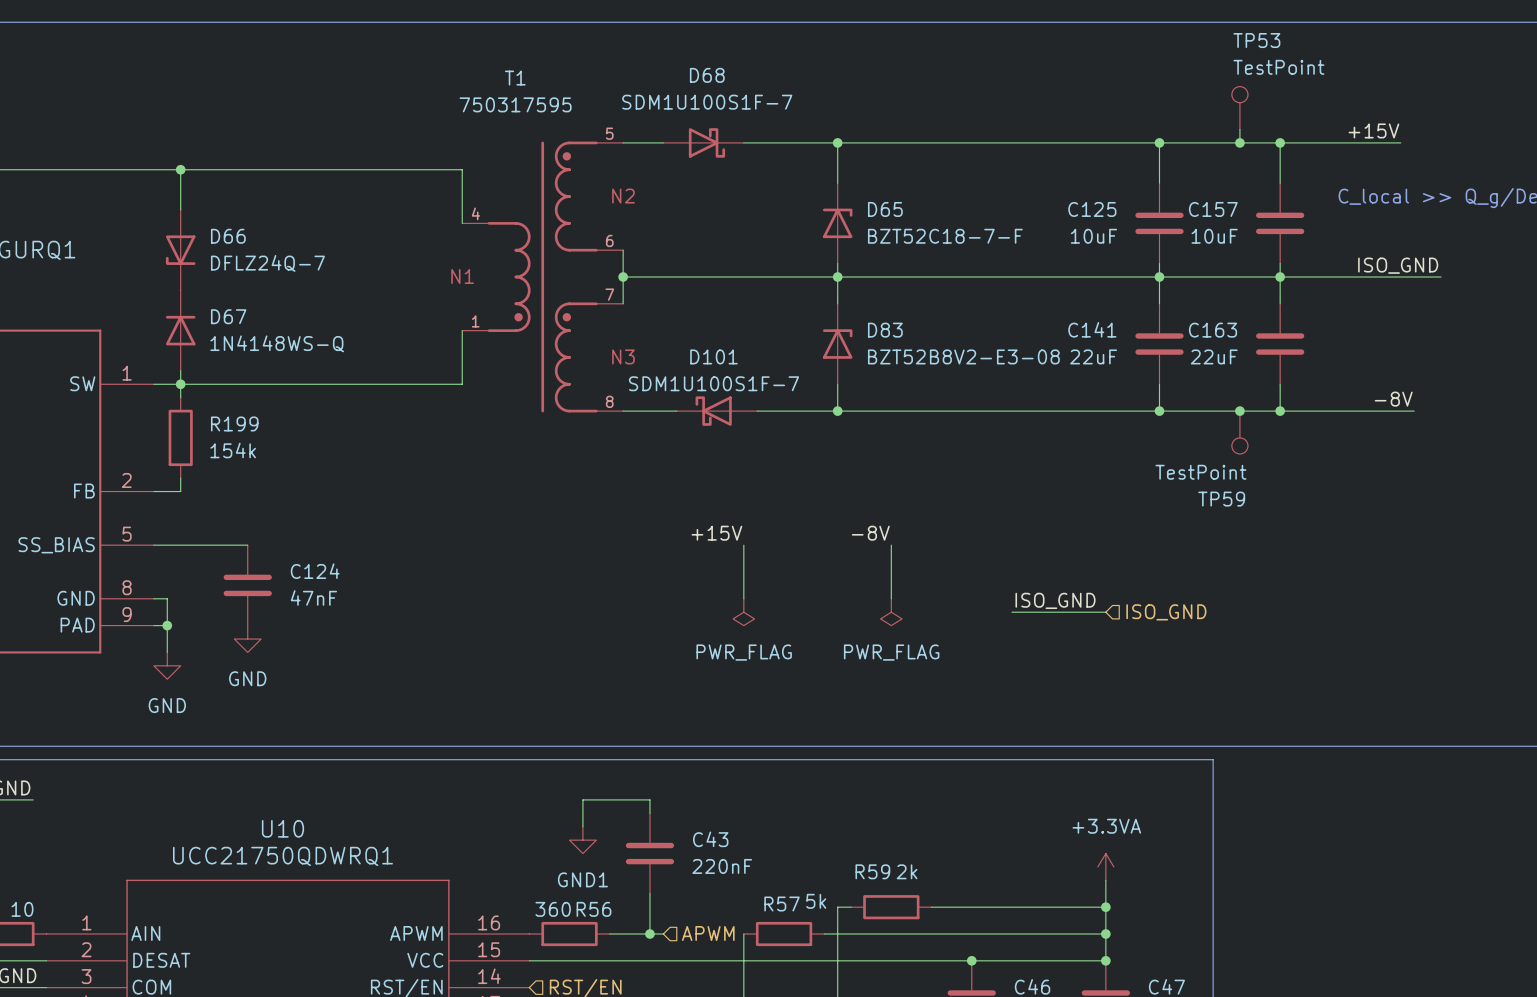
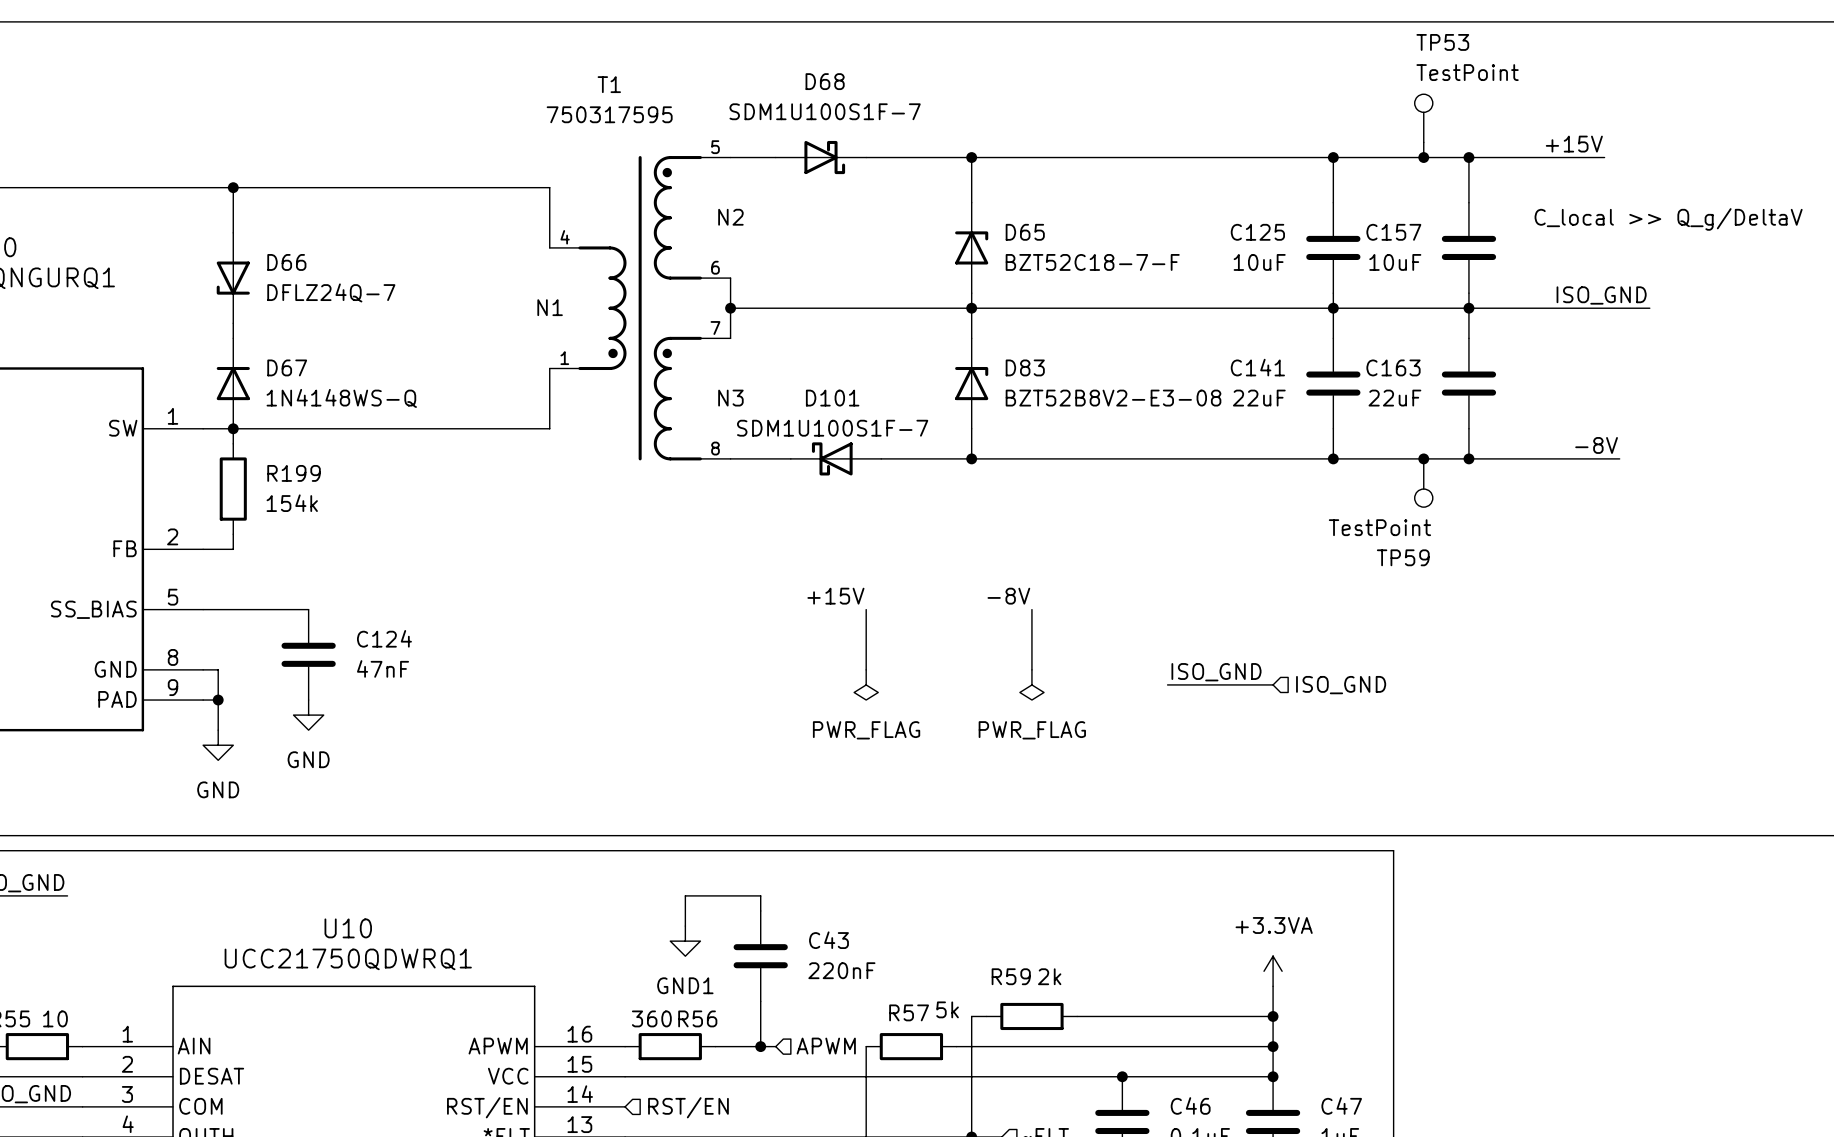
D67 position: (180, 330) -> (233, 383)

